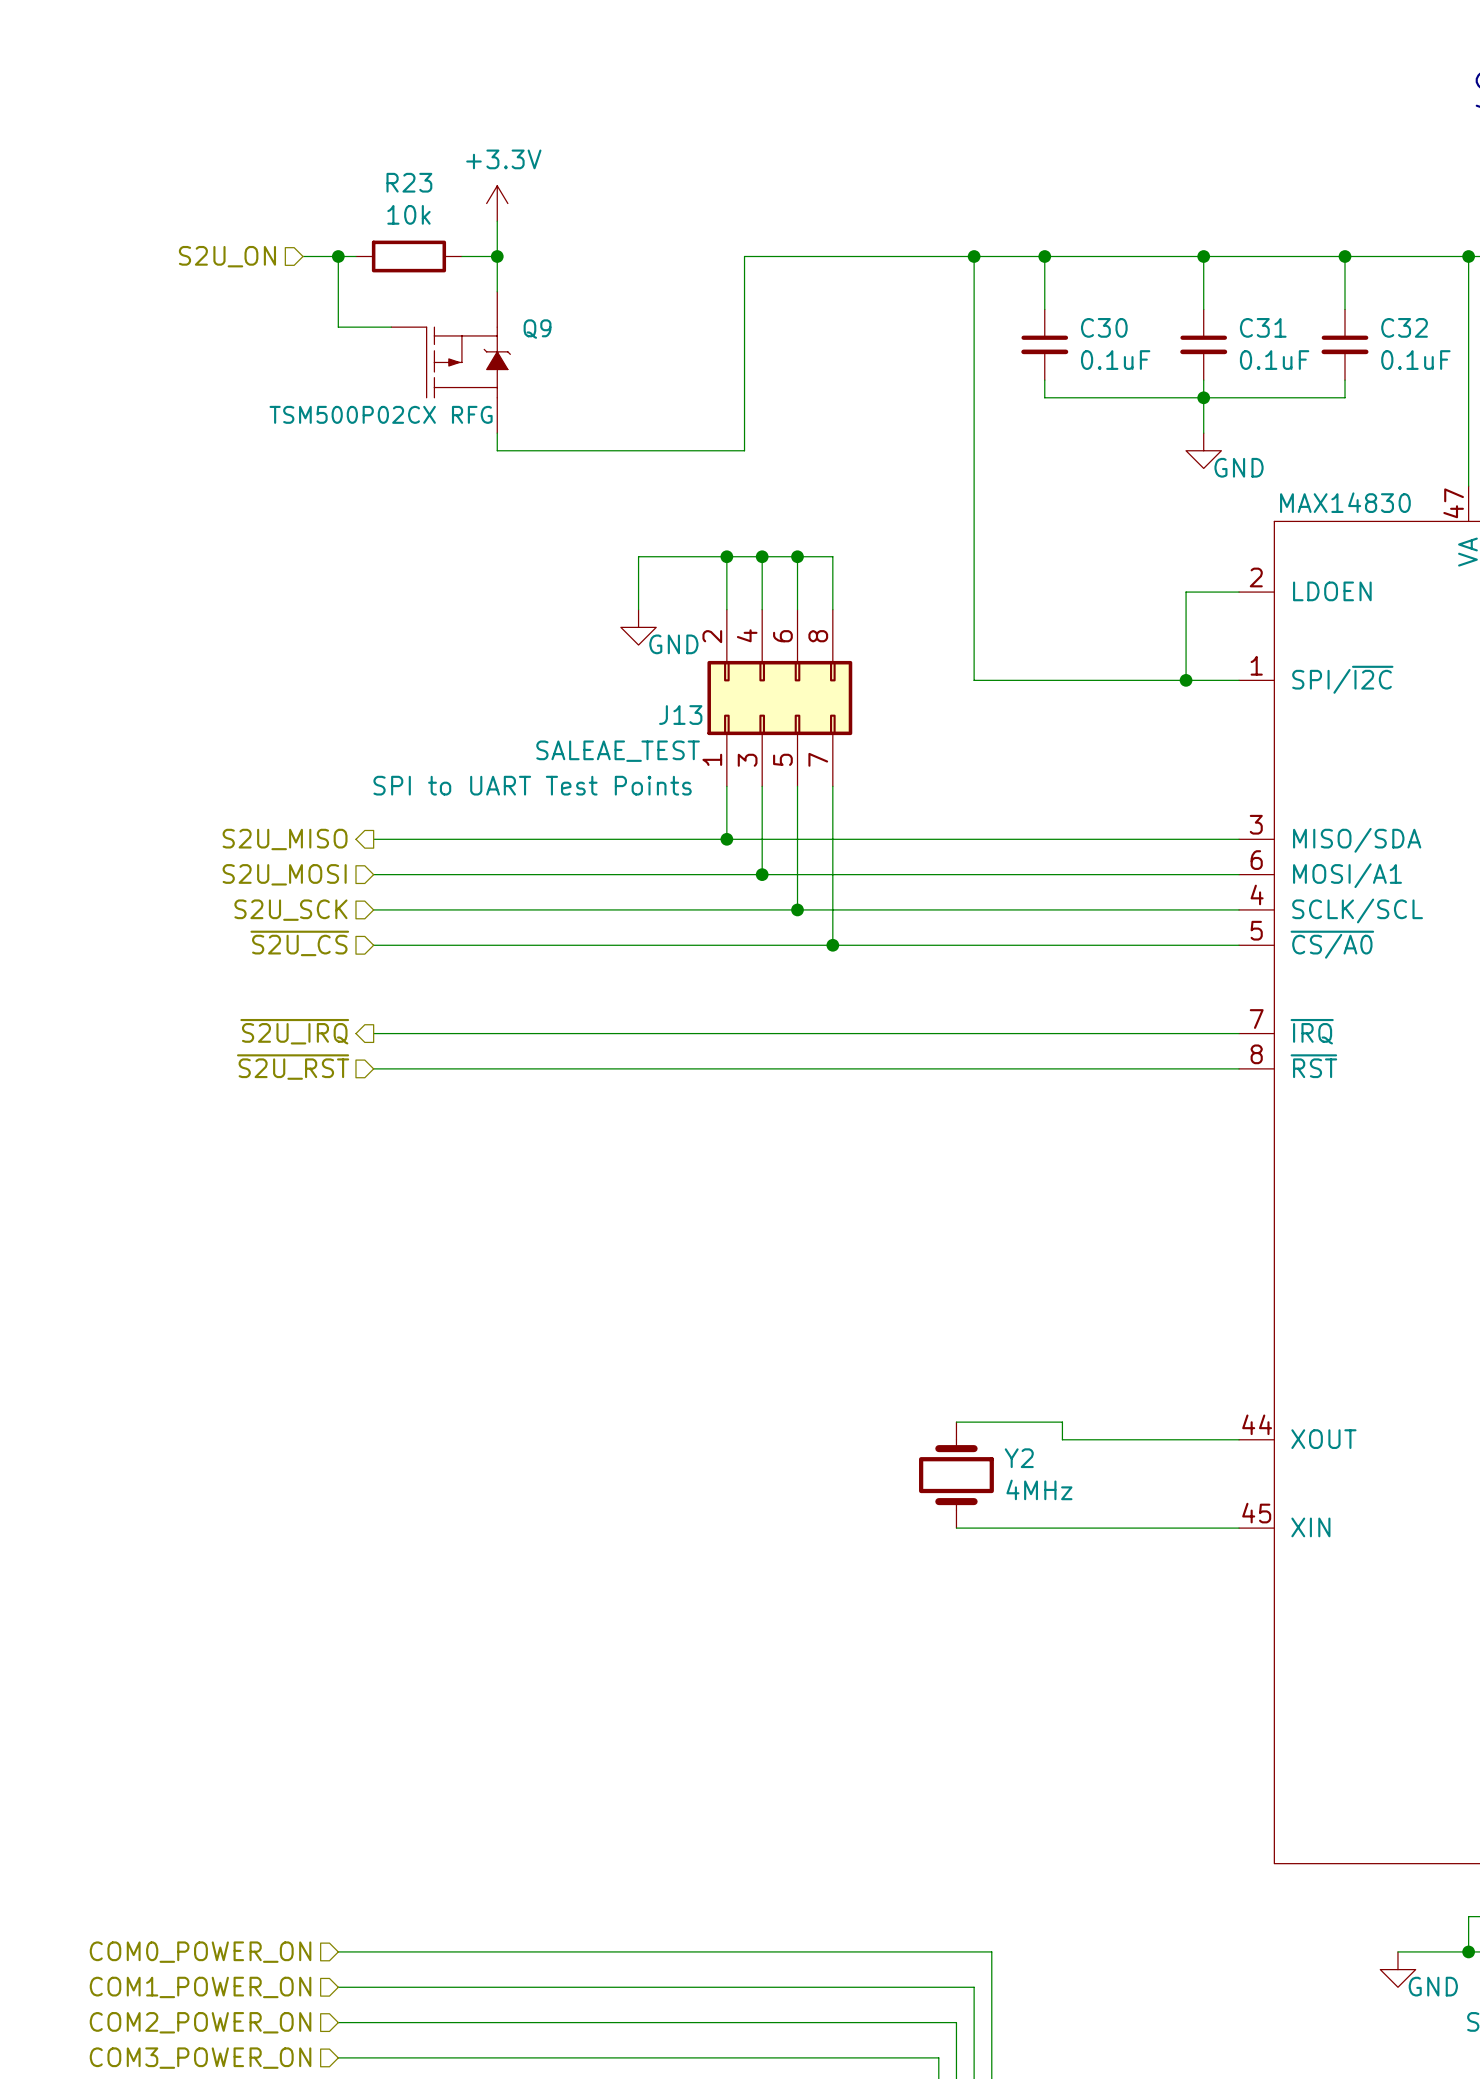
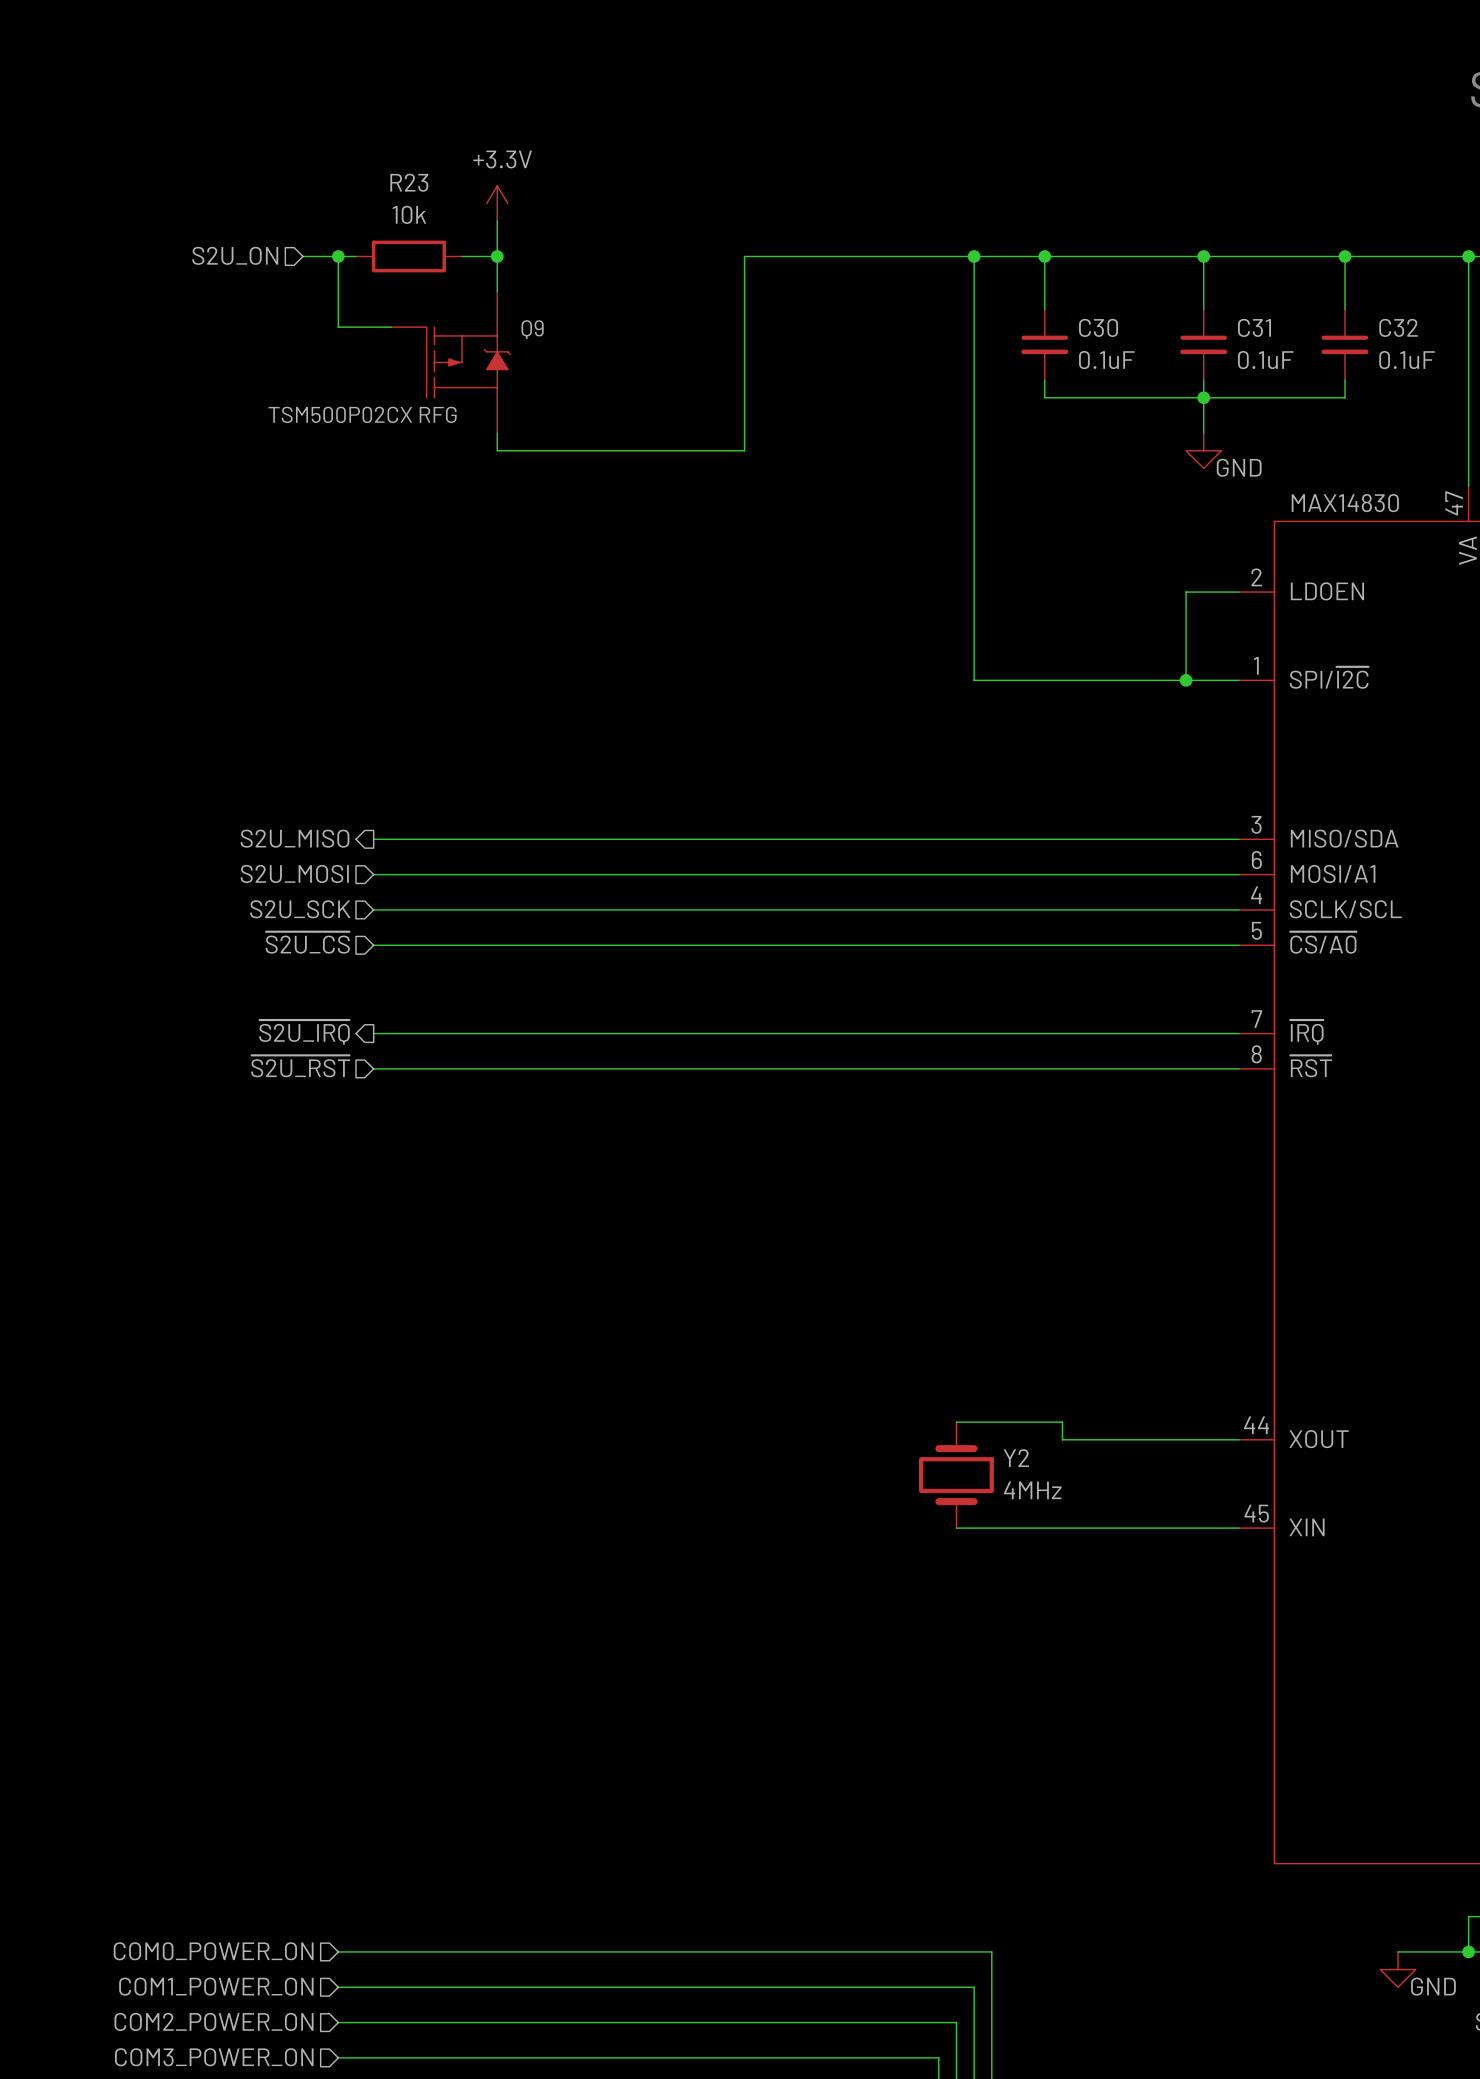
wire: (726, 556) (726, 609) -> none
junction: (726, 556) -> none
wire: (762, 556) (762, 609) -> none
junction: (762, 556) -> none
wire: (797, 556) (797, 609) -> none
junction: (797, 556) -> none
wire: (638, 609) (638, 556) (832, 556) (832, 609) -> none
power symbol: GND (638, 627) -> none
J13: SALEAE_TEST (779, 698) -> none
wire: (726, 786) (726, 839) -> none
wire: (762, 786) (762, 874) -> none
wire: (797, 786) (797, 909) -> none
wire: (832, 786) (832, 945) -> none
junction: (726, 839) -> none
junction: (762, 874) -> none
junction: (797, 909) -> none
junction: (832, 945) -> none

